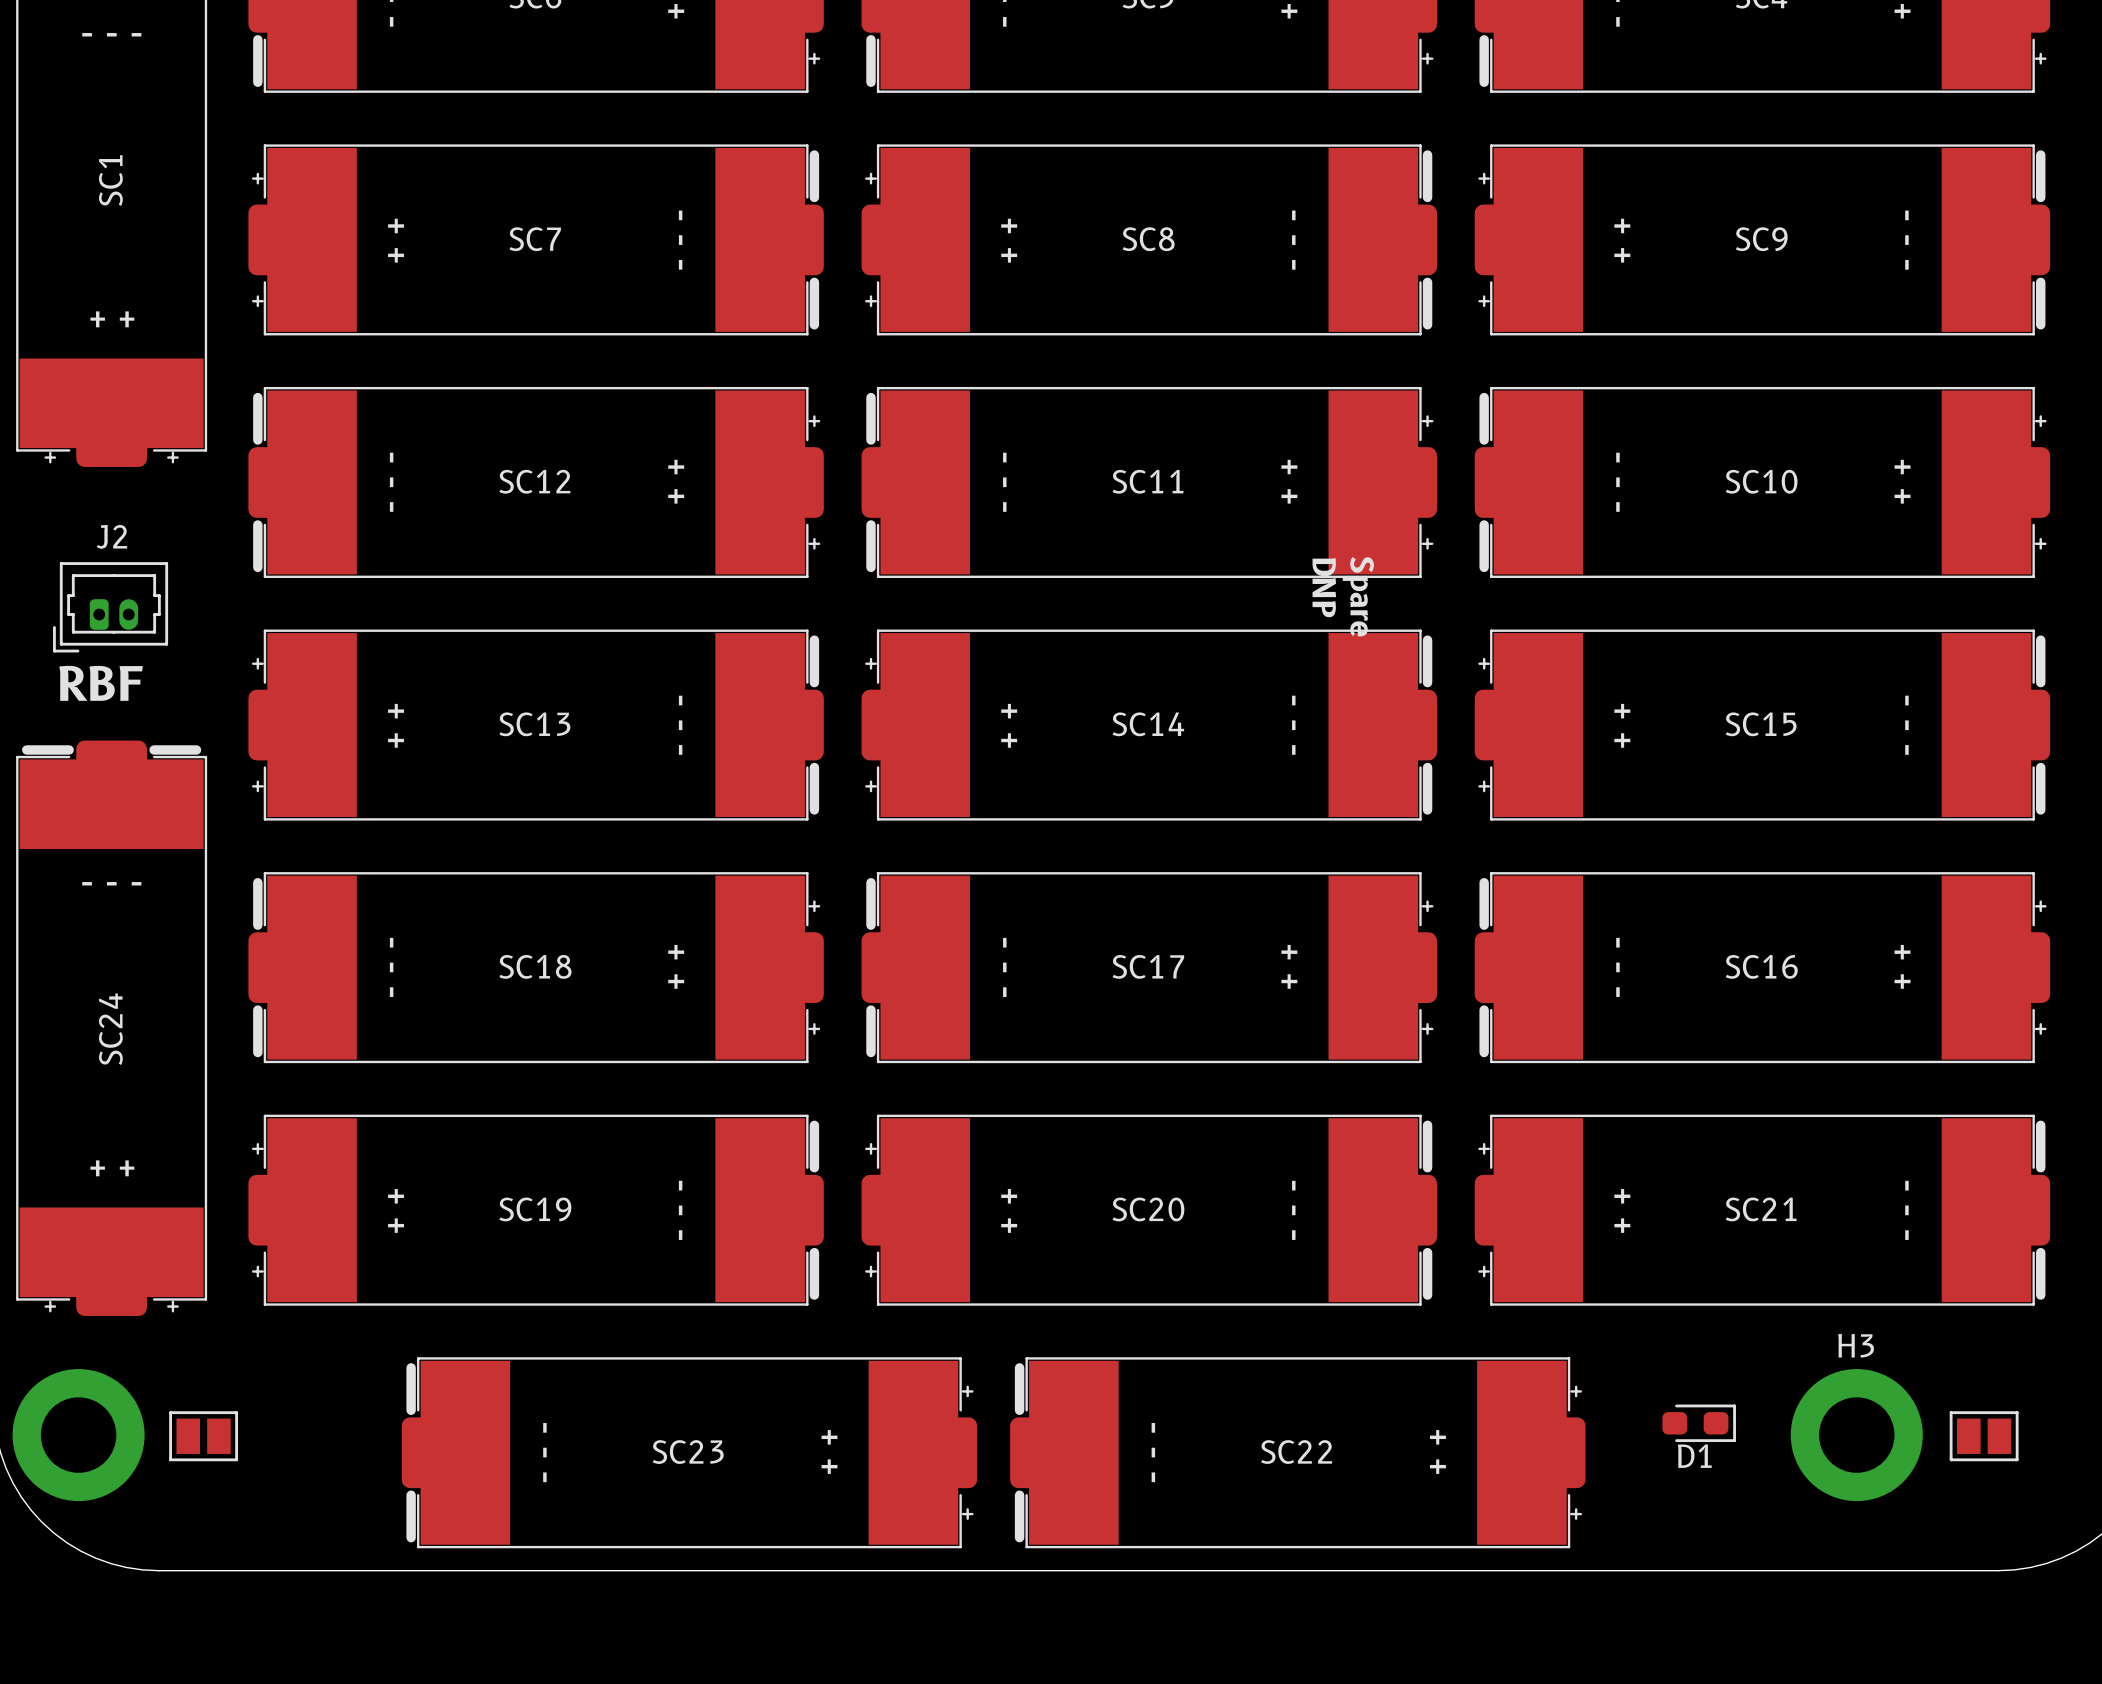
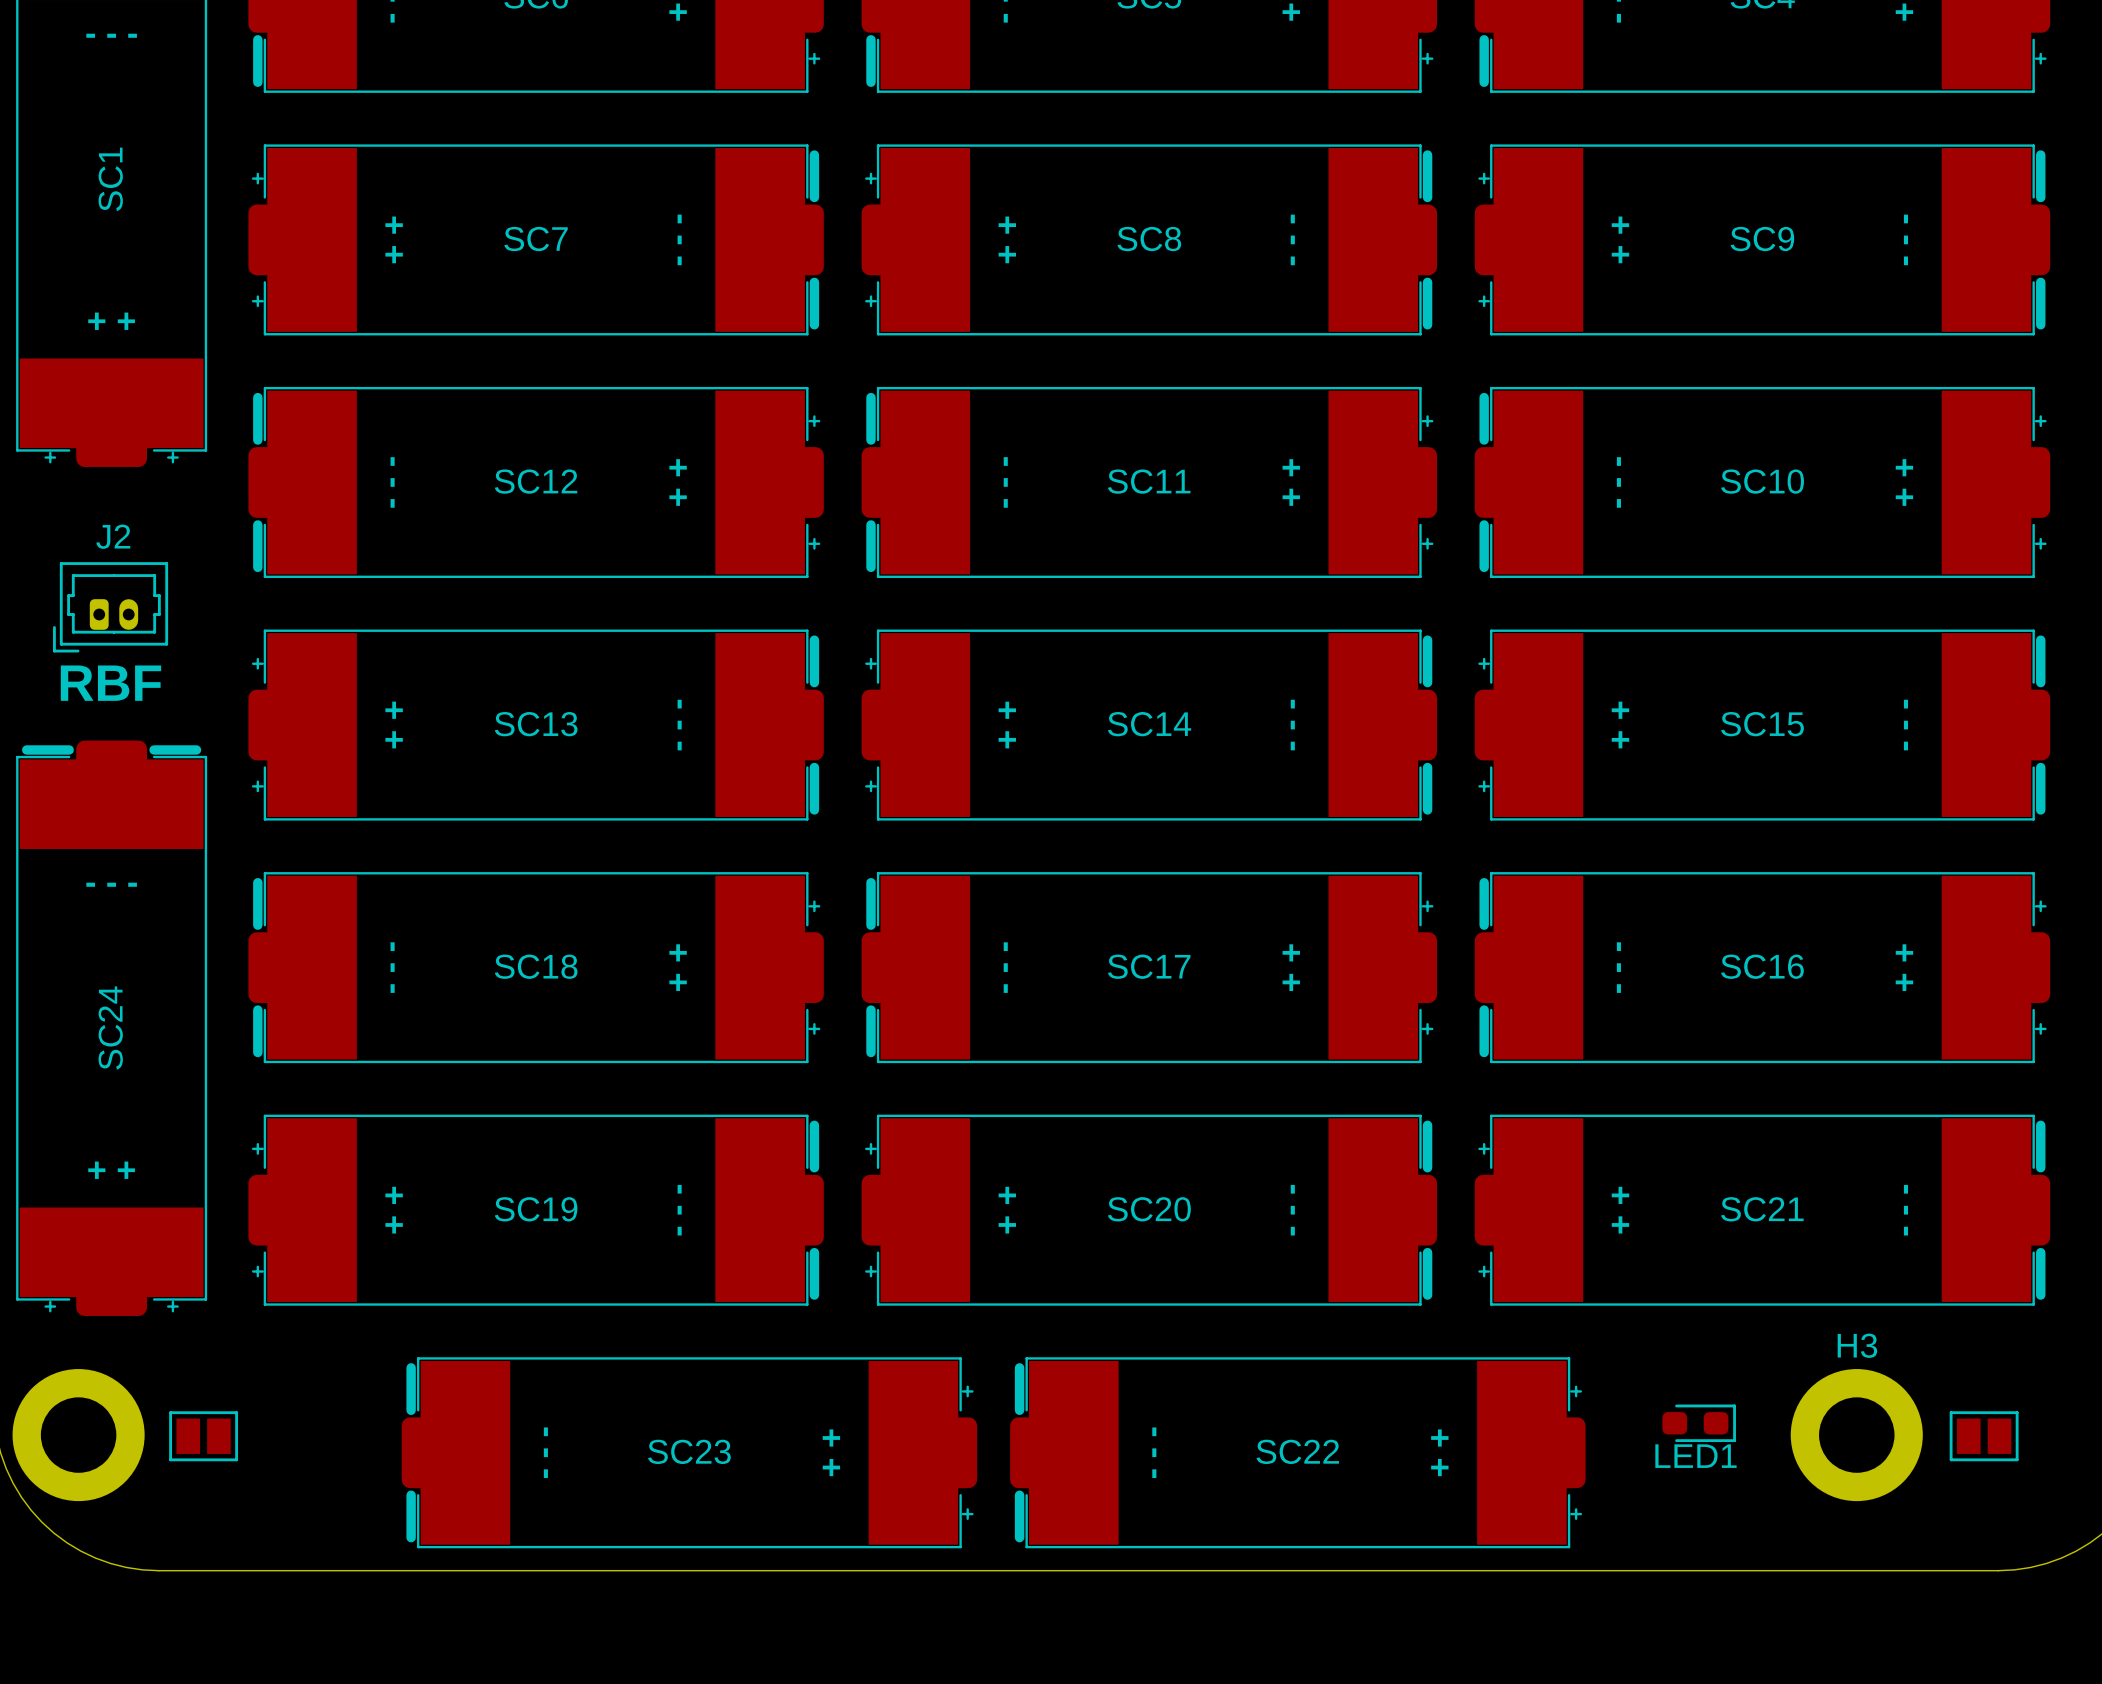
text: DNP (1324, 587) -> none
text: Spare (1358, 596) -> none
D1 name: D1 (1694, 1456) -> LED1 (1695, 1456)

